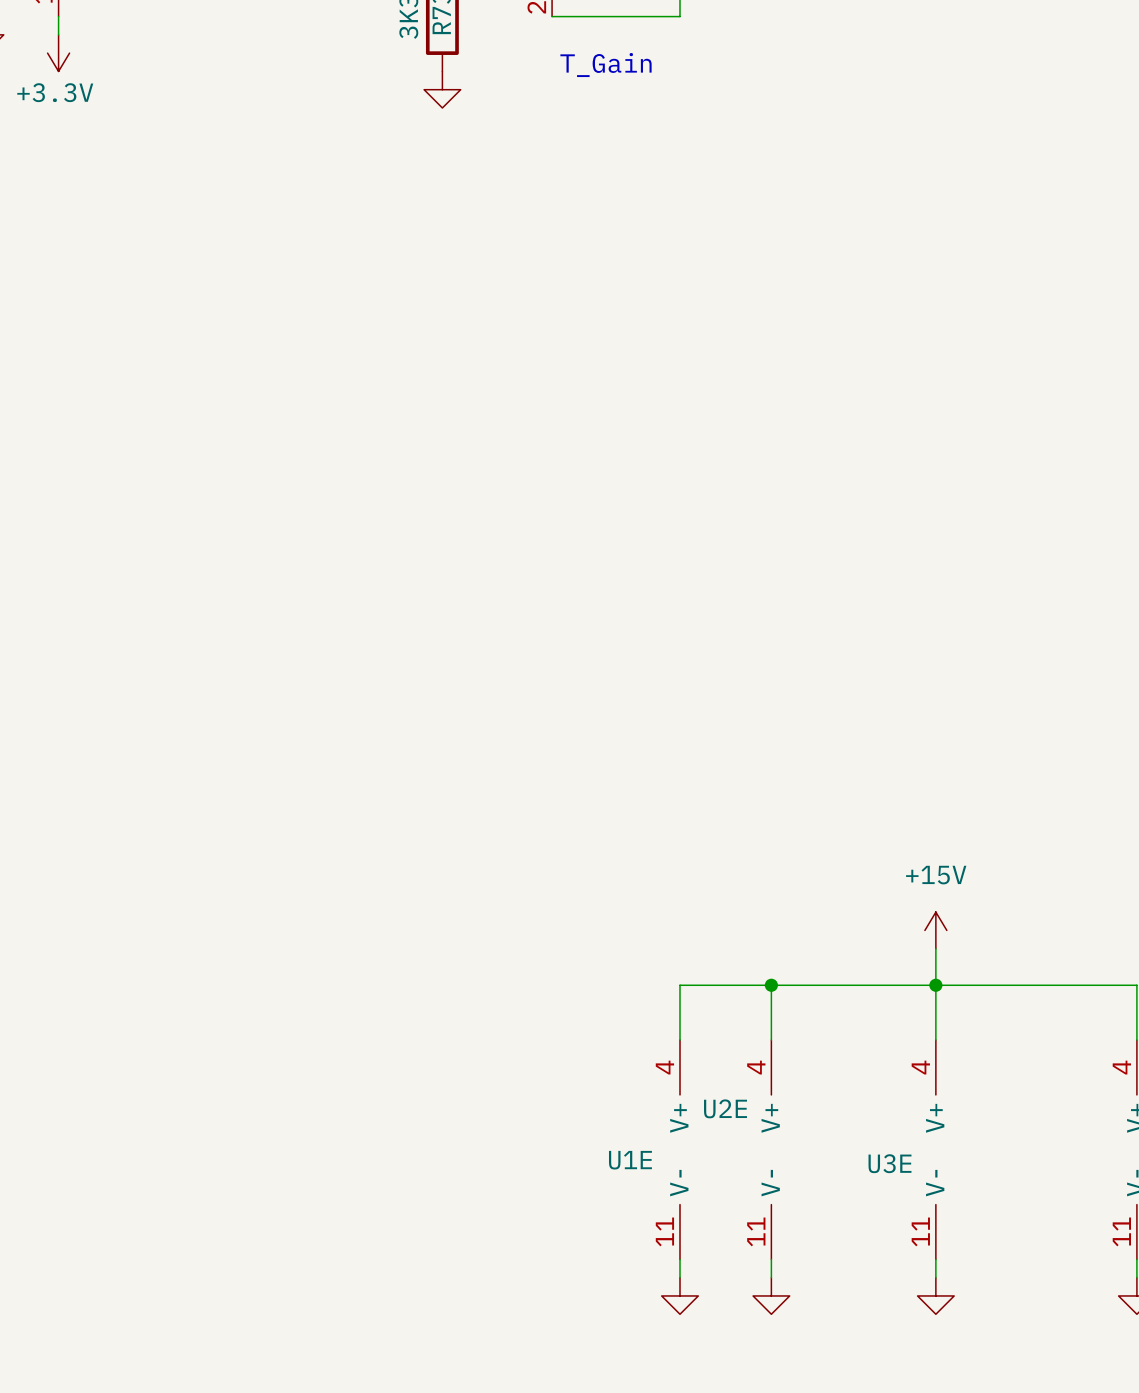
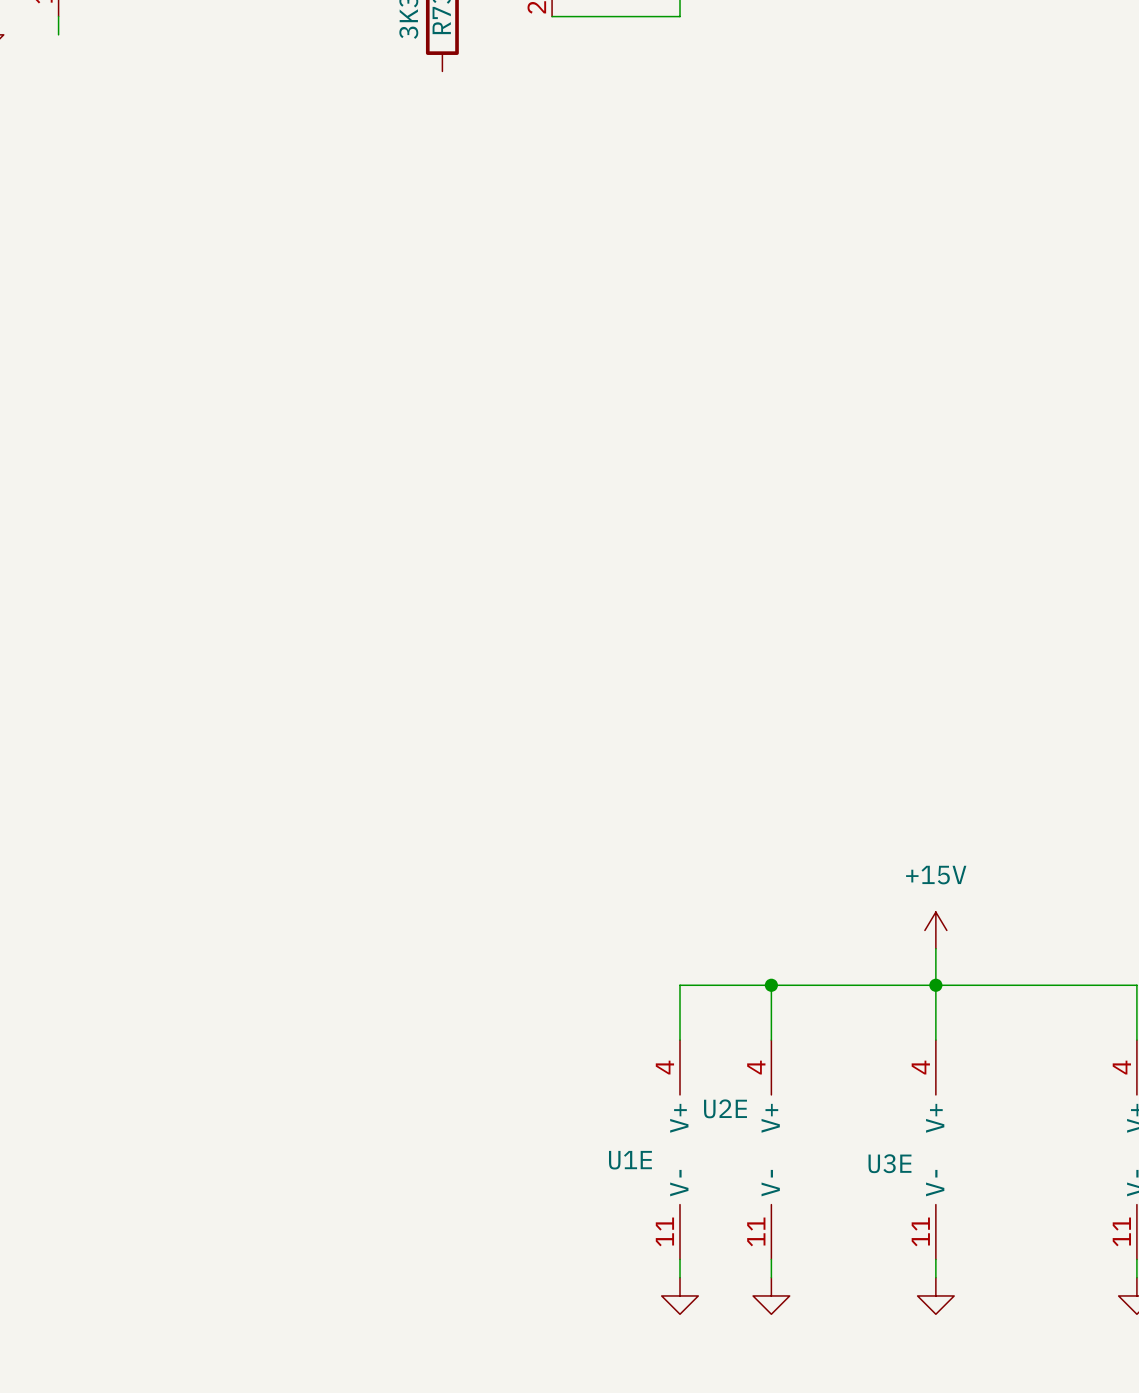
power symbol: +3.3V (58, 53) -> none
text: T_Gain (606, 65) -> none
power symbol: (442, 89) -> none

